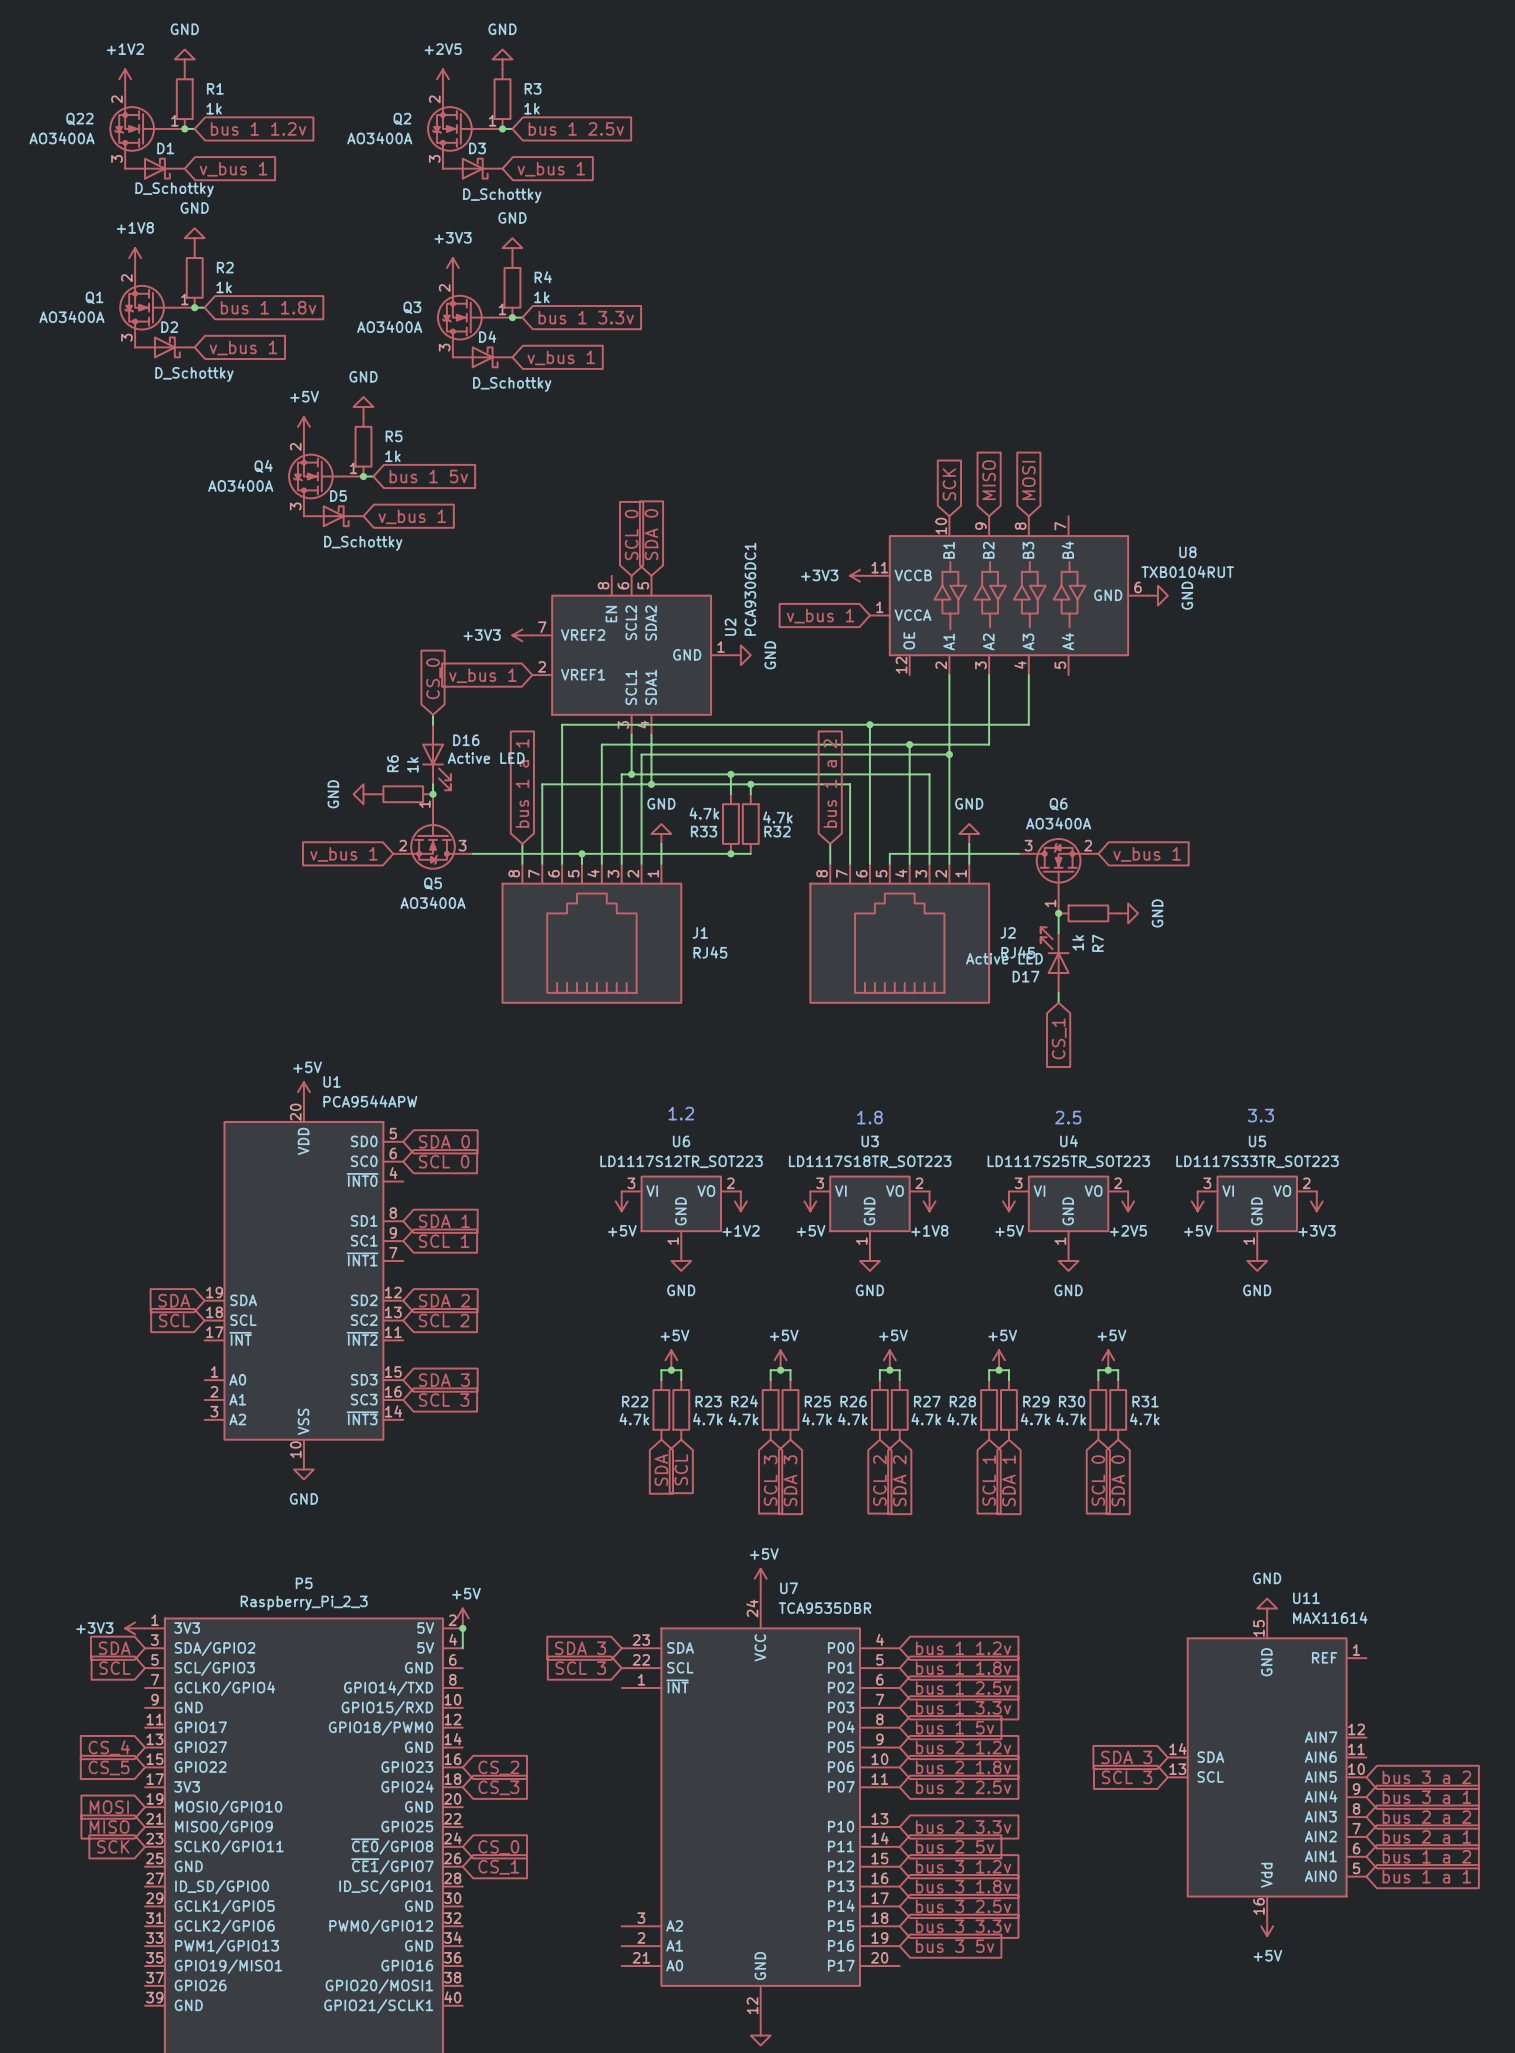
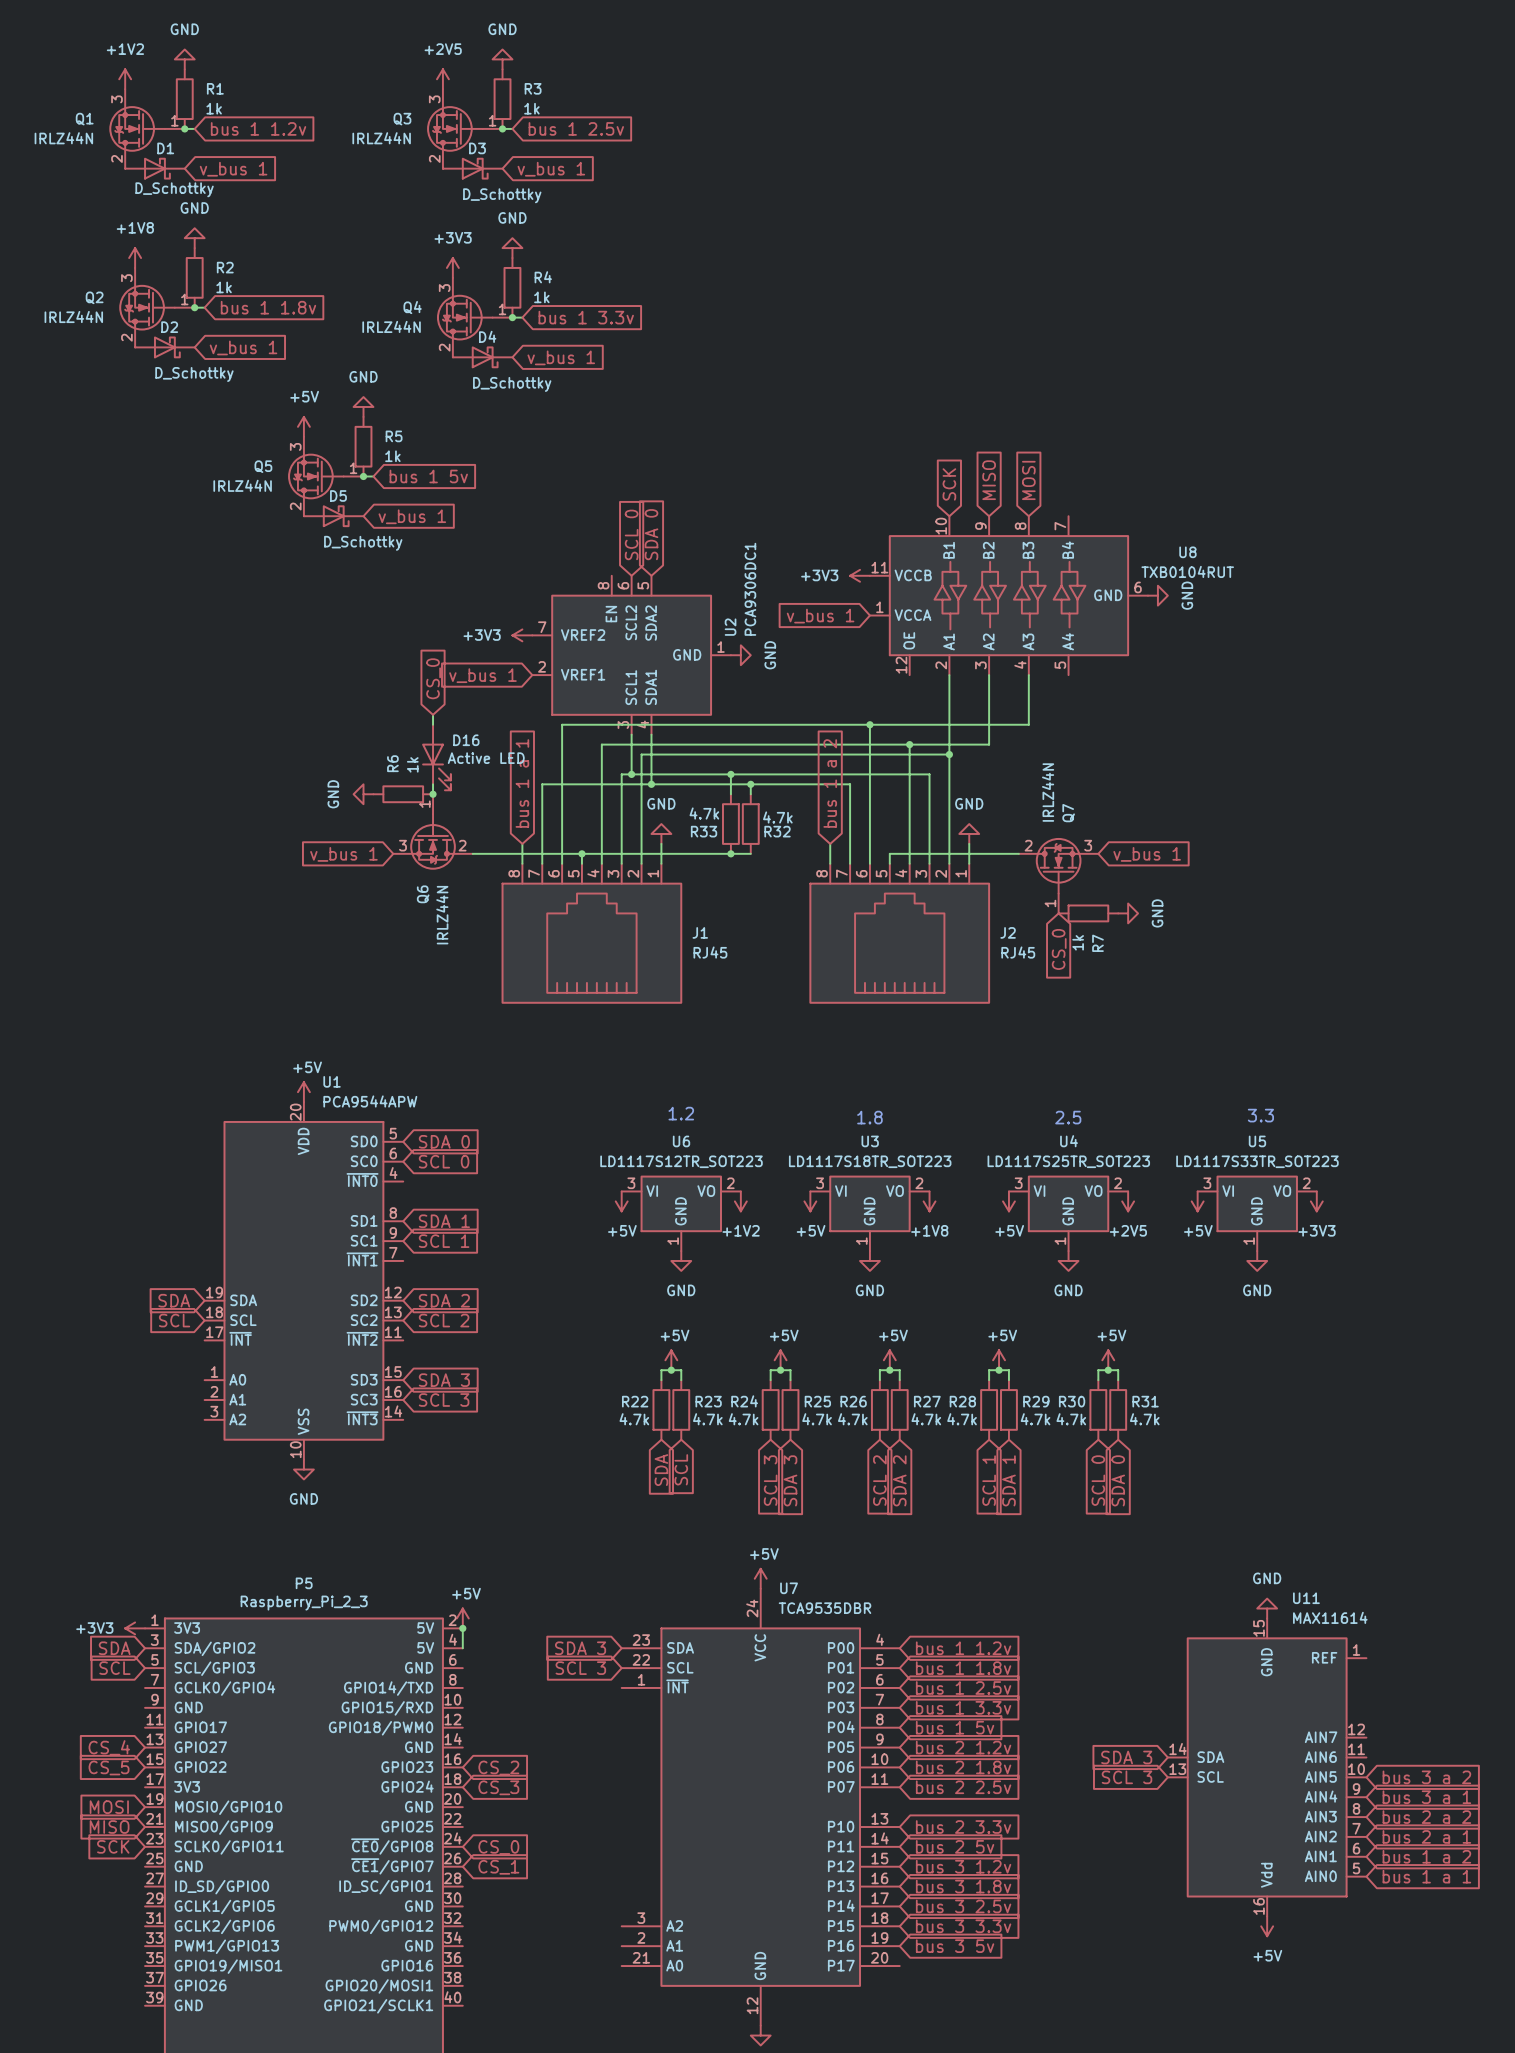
Q2 pin number: 2 (434, 99) -> 3 (126, 278)
Q22: AO3400A (147, 128) -> none
Q2 position: (464, 128) -> (156, 307)
Q2 value: AO3400A (379, 138) -> IRLZ44N (73, 317)
Q2 pin number: 3 (434, 158) -> 2 (126, 337)
Q1 pin number: 2 (126, 278) -> 3 (116, 99)
Q3 pin number: 2 (444, 288) -> 3 (434, 99)
Q1 position: (156, 307) -> (147, 128)
Q1 value: AO3400A (71, 317) -> IRLZ44N (63, 138)
Q3 position: (474, 317) -> (464, 128)
Q3 value: AO3400A (389, 326) -> IRLZ44N (381, 138)
Q1 pin number: 3 (126, 337) -> 2 (116, 158)
Q3 pin number: 3 (444, 347) -> 2 (434, 158)
Q4 pin number: 2 (295, 446) -> 3 (444, 288)
Q4 position: (325, 476) -> (474, 317)
Q4 value: AO3400A (240, 485) -> IRLZ44N (391, 326)
Q4 pin number: 3 (295, 506) -> 2 (444, 347)
Q5 symbol: [393, 794, 473, 870] -> [288, 436, 364, 517]
Q6 name position: Q6 (1058, 804) -> Q6 (423, 894)
Q6 value: AO3400A (1058, 823) -> IRLZ44N (442, 915)
Q6 symbol: [1018, 837, 1099, 914] -> [393, 794, 473, 870]
Q7: none -> IRLZ44N (1058, 875)
Q5 name position: Q5 (433, 883) -> Q5 (263, 466)
Q5 value: AO3400A (433, 902) -> IRLZ44N (242, 485)
wire: (1058, 913) (1058, 933) -> none
junction: (1058, 913) -> none
global label: none -> CS_0 (1059, 949)
D17: Active LED (1055, 960) -> none
wire: (1058, 992) (1058, 1002) -> none
global label: CS_1 (1059, 1038) -> none

